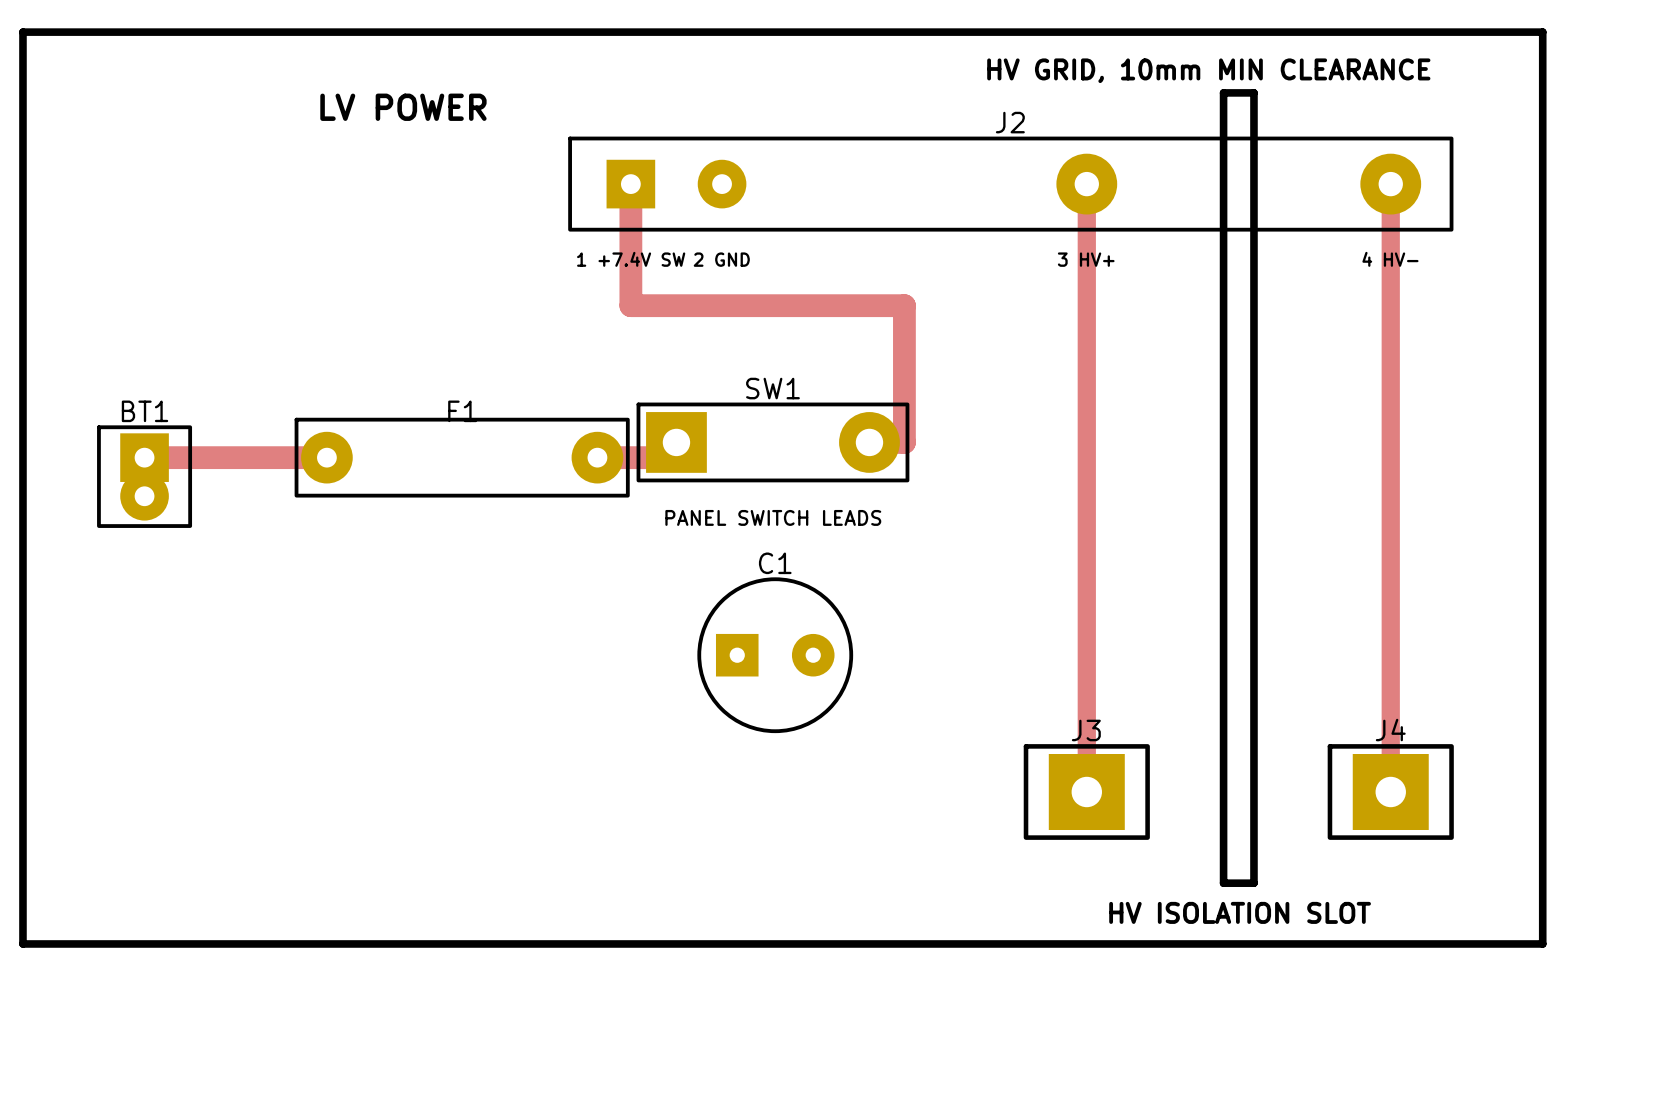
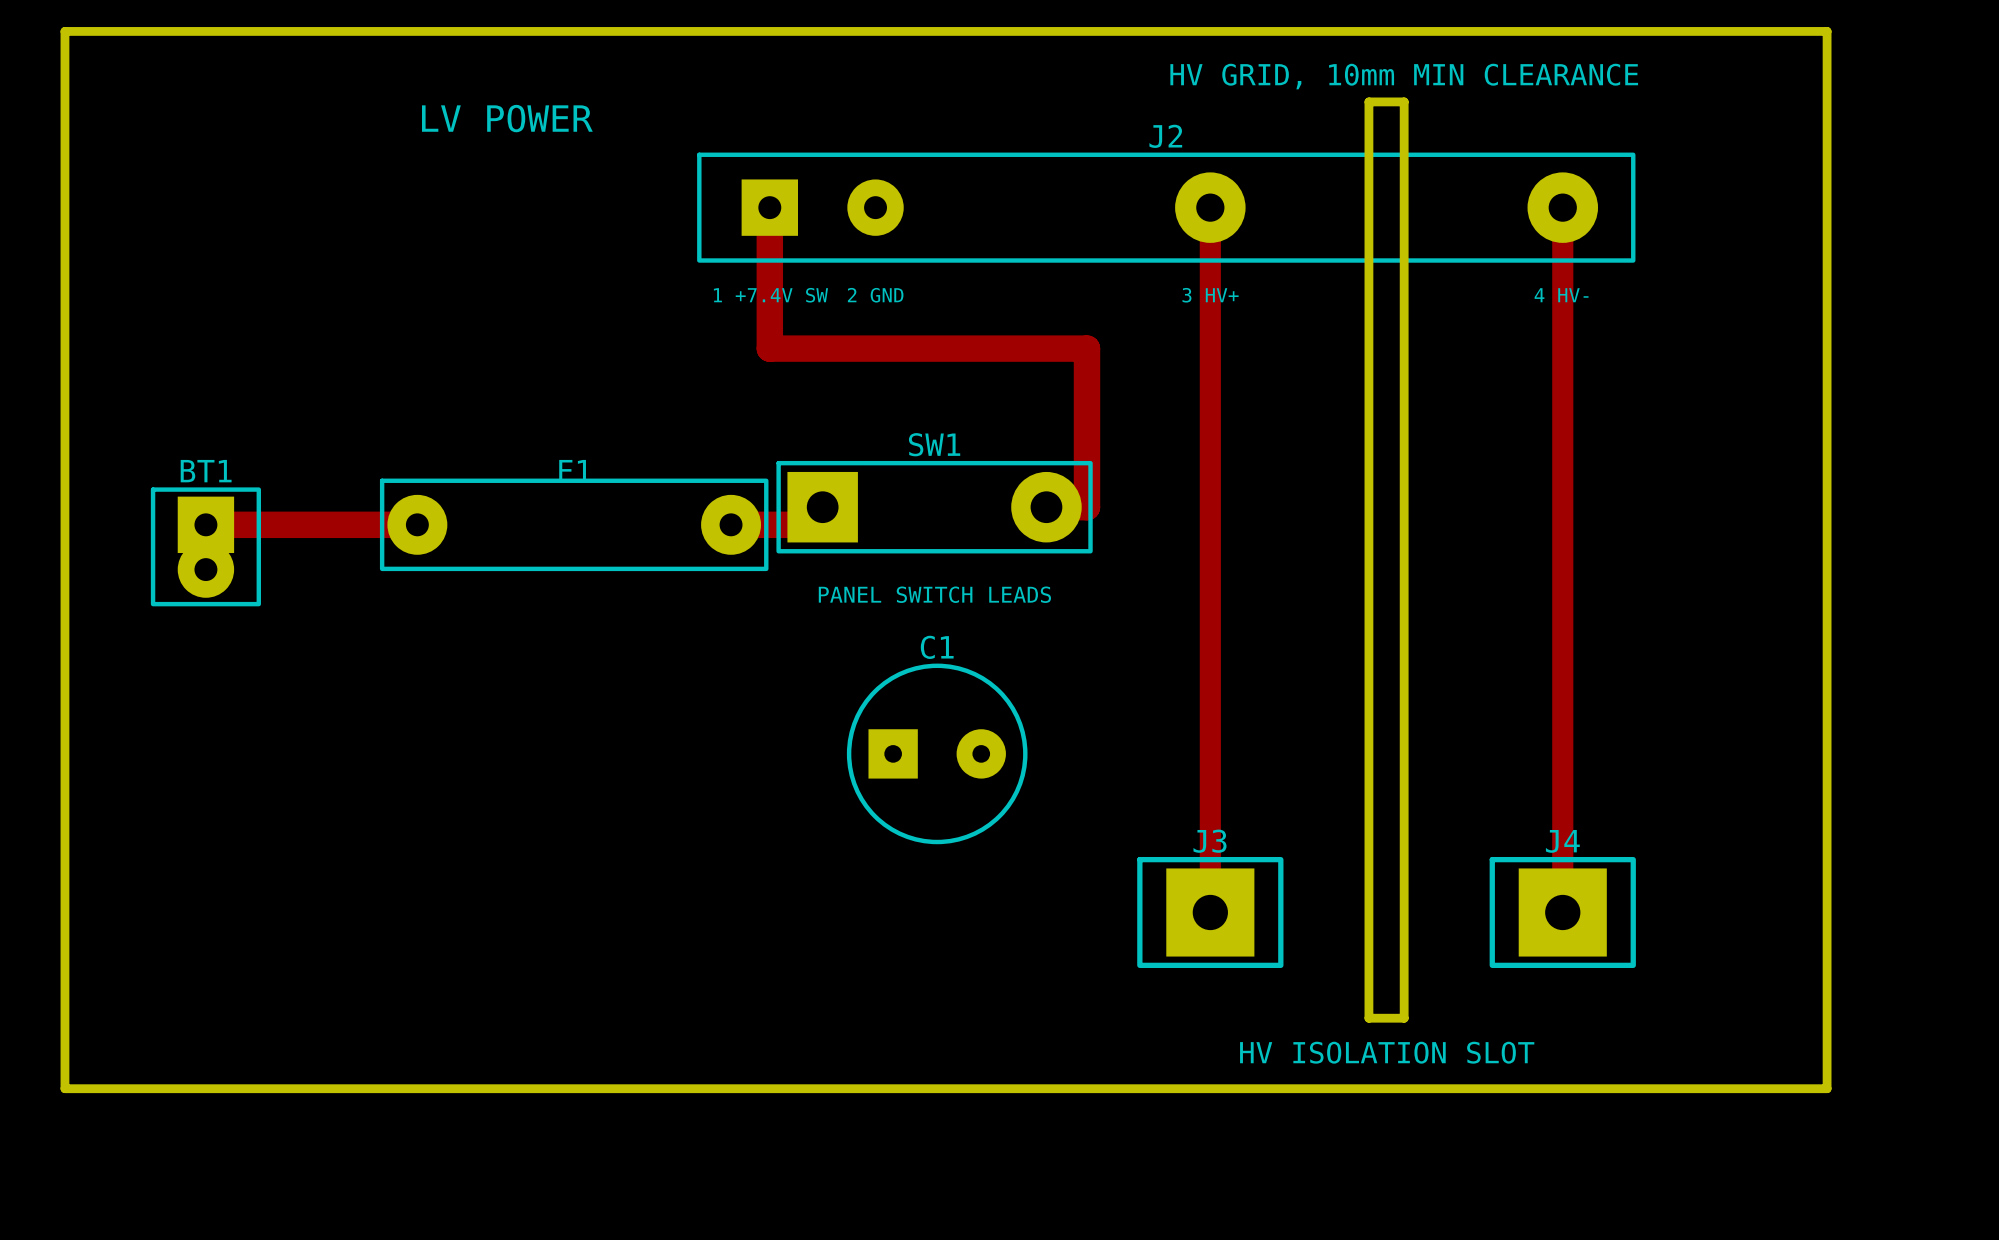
text position: HV GRID, 10mm MIN CLEARANCE (1208, 70) -> HV GRID, 10mm MIN CLEARANCE (1404, 76)
board edge: (1223, 92) (1253, 92) (1253, 883) (1223, 883) (1223, 92) -> (1368, 101) (1404, 101) (1404, 1018) (1368, 1018) (1368, 101)
J2 footprint: [568, 136, 1454, 232] -> [697, 152, 1636, 263]
track: (1086, 184) (1086, 791) -> (1210, 207) (1210, 912)
track: (1390, 184) (1390, 791) -> (1562, 207) (1562, 912)
J3 position: (1086, 791) -> (1210, 912)
J4 position: (1390, 791) -> (1562, 912)
text position: HV ISOLATION SLOT (1240, 912) -> HV ISOLATION SLOT (1387, 1052)

